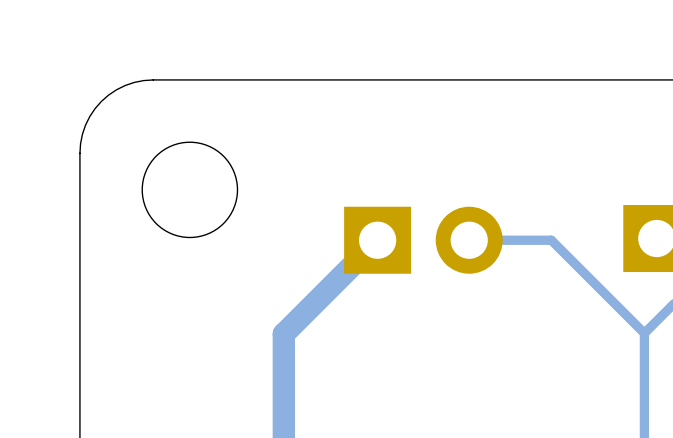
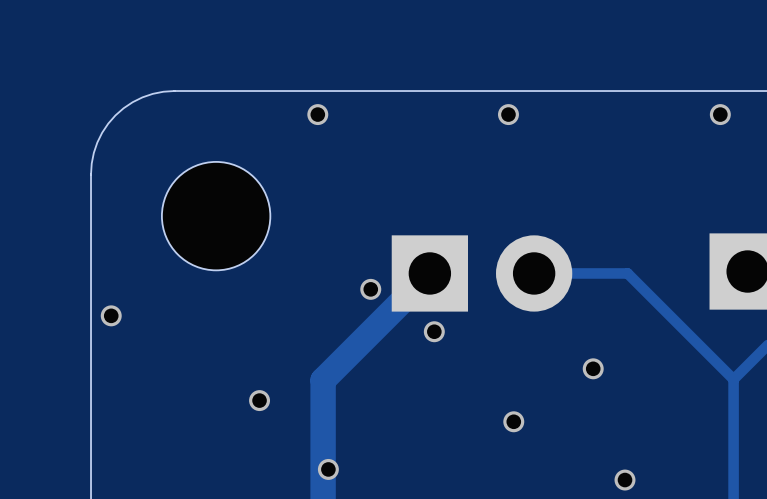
via: none -> (317, 114)
via: none -> (508, 114)
via: none -> (720, 114)
via: none -> (370, 289)
via: none -> (111, 315)
via: none -> (434, 331)
via: none -> (593, 368)
via: none -> (259, 400)
via: none -> (513, 421)
via: none -> (328, 469)
via: none -> (625, 480)

